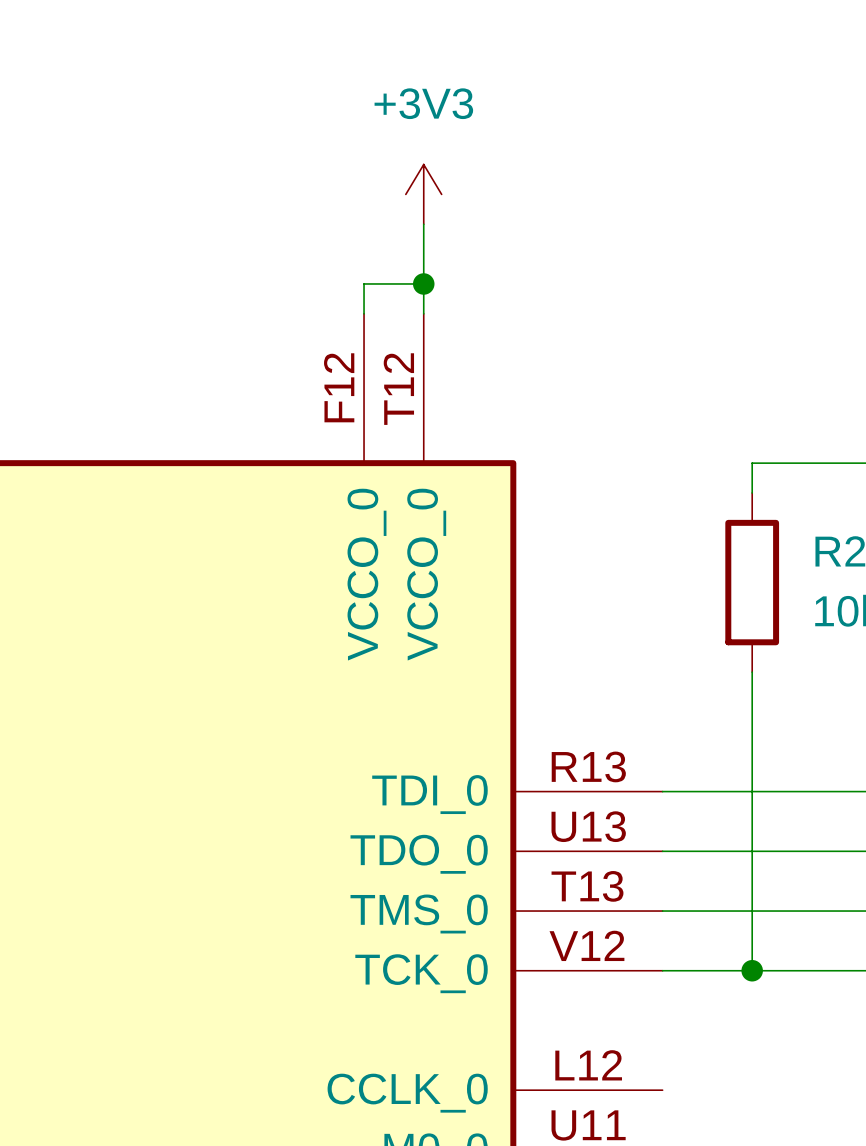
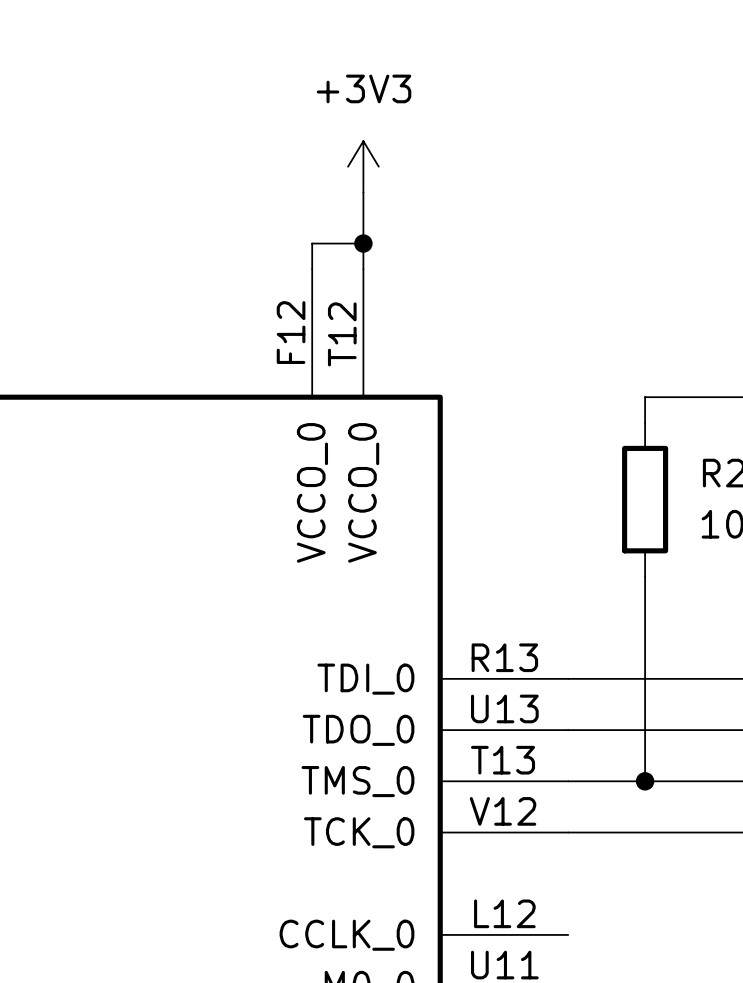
wire: (752, 911) (752, 970) -> none
junction position: (752, 970) -> (645, 781)

